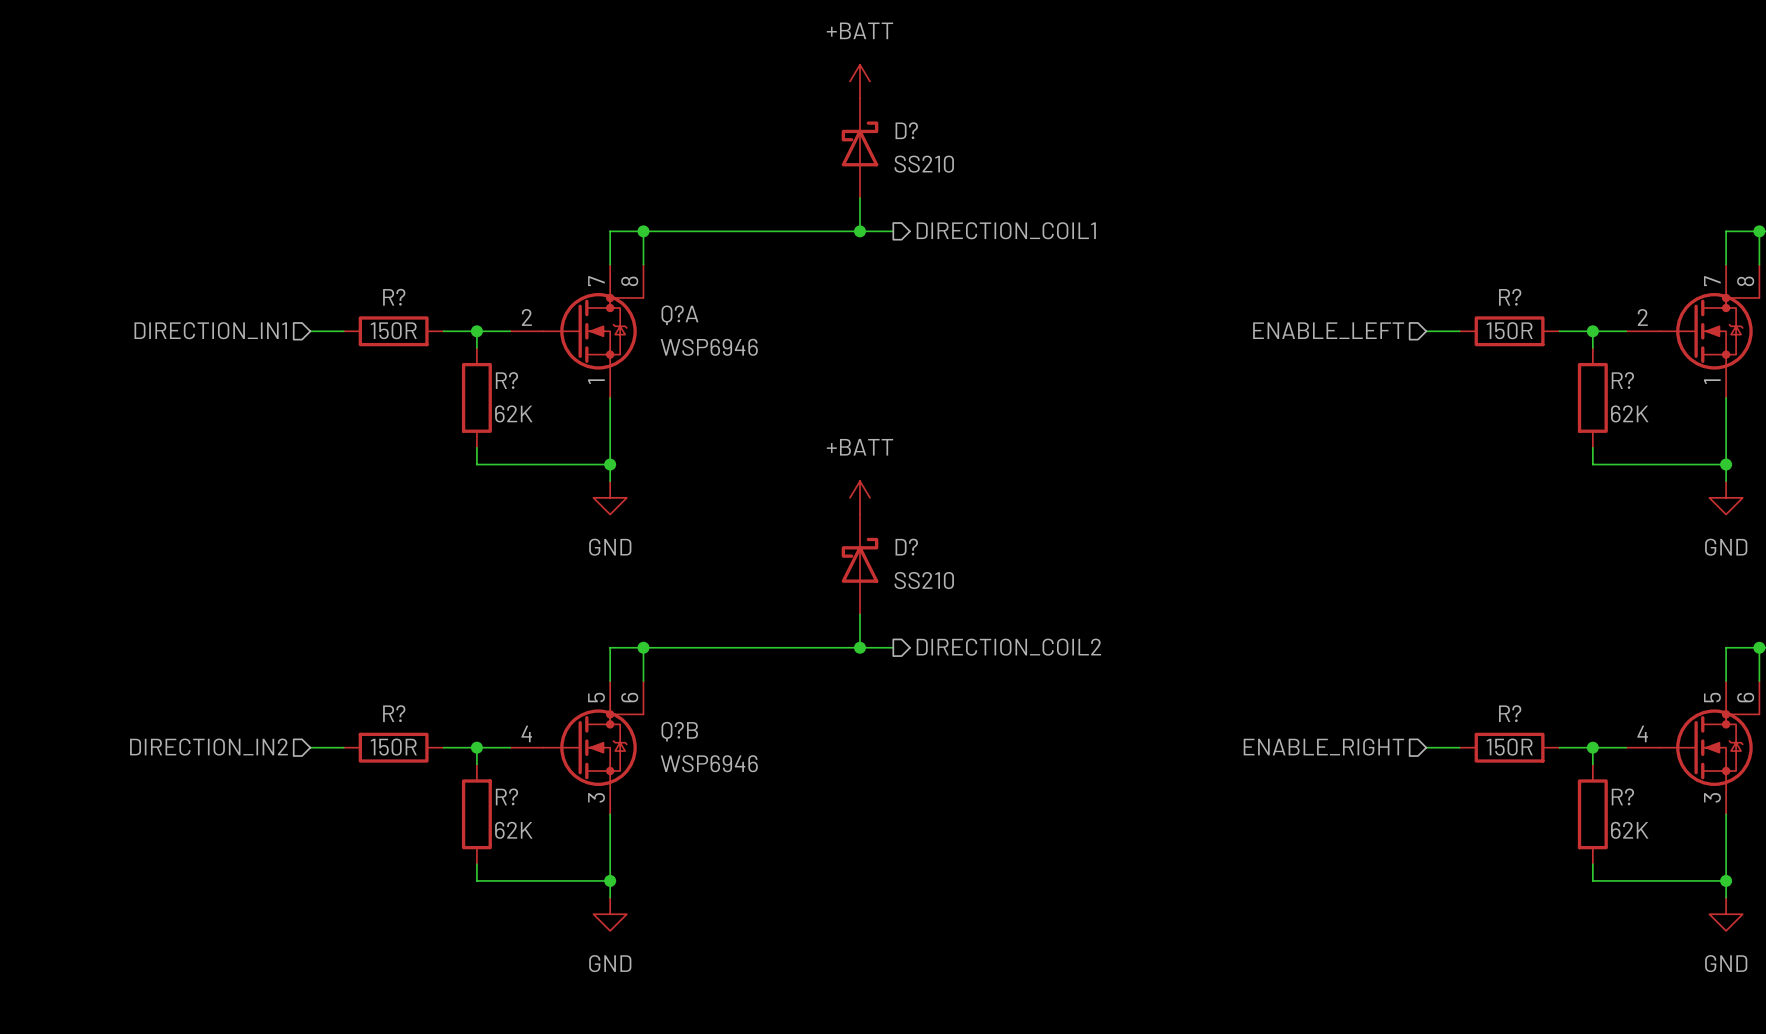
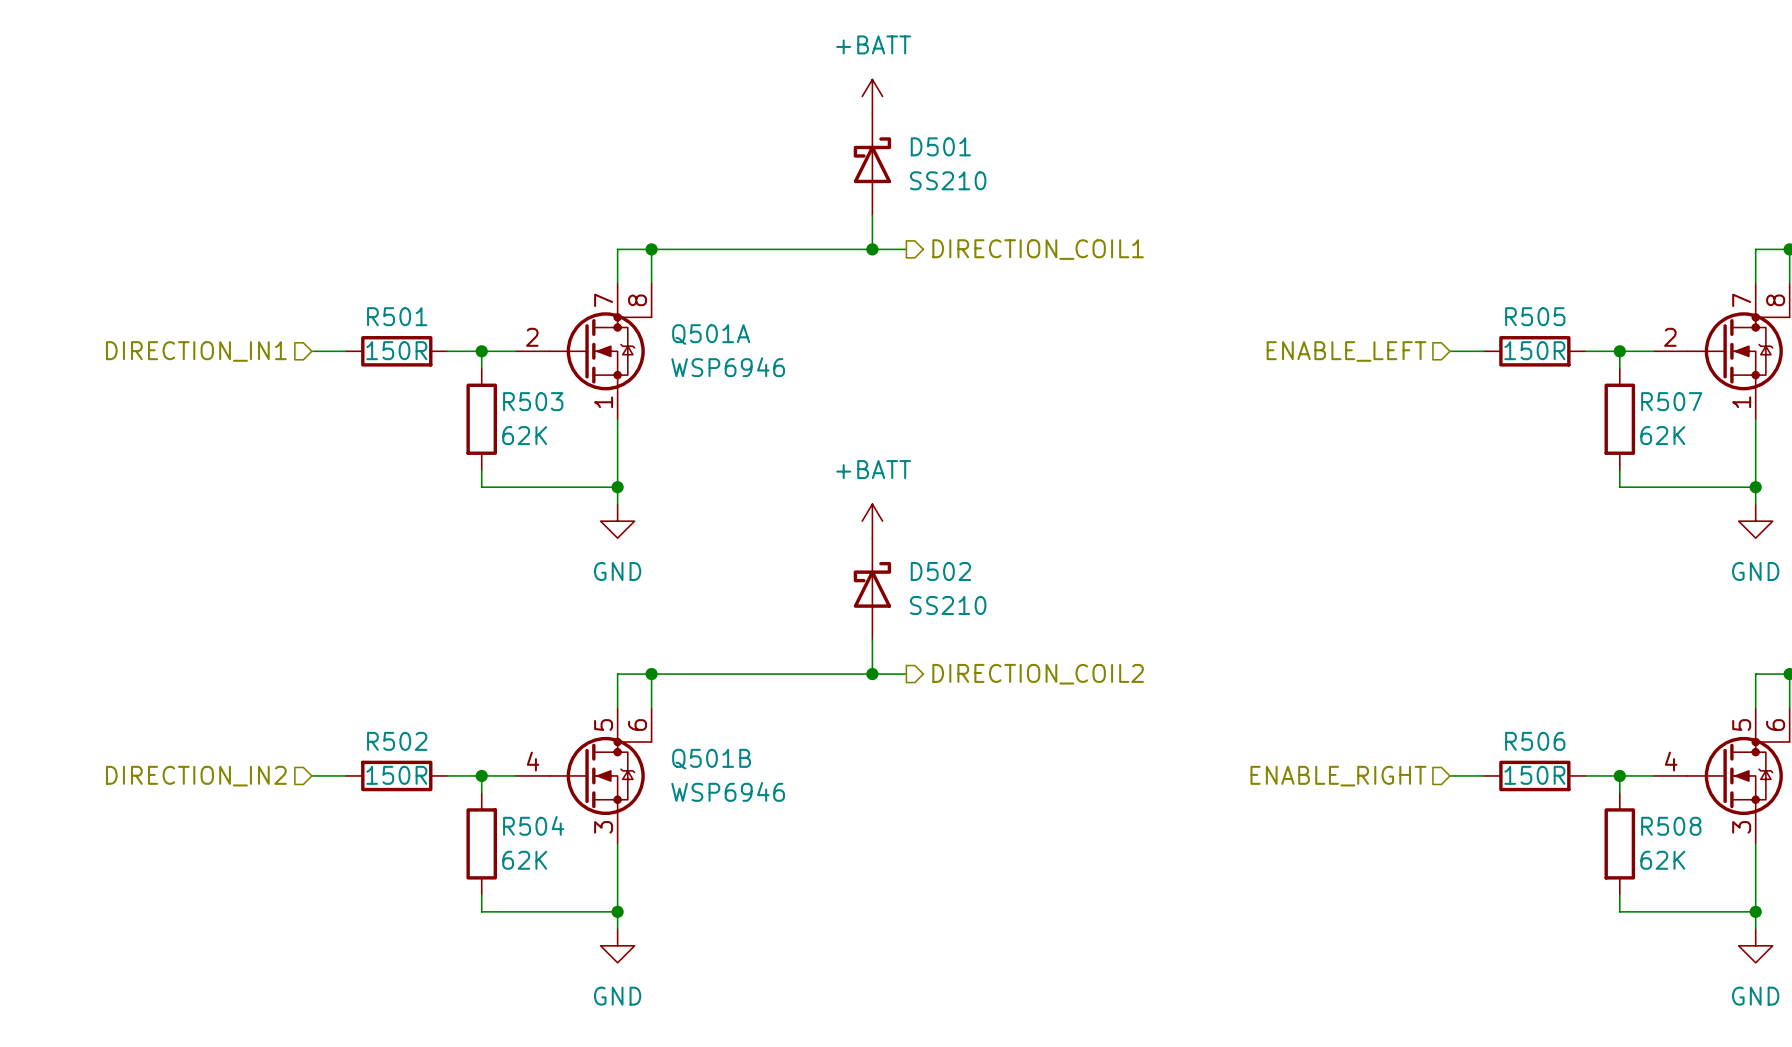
D? name: D? (906, 130) -> D501 (940, 146)
R? name: R? (394, 297) -> R501 (397, 316)
R? name: R? (1510, 297) -> R505 (1535, 316)
Q?A name: Q?A (679, 315) -> Q501A (711, 334)
R? name: R? (506, 380) -> R503 (533, 401)
R? name: R? (1622, 380) -> R507 (1671, 401)
D? name: D? (906, 547) -> D502 (940, 571)
R? name: R? (394, 713) -> R502 (397, 741)
R? name: R? (1510, 713) -> R506 (1535, 741)
Q?B name: Q?B (679, 731) -> Q501B (711, 759)
R? name: R? (506, 796) -> R504 (533, 825)
R? name: R? (1622, 796) -> R508 (1671, 826)

